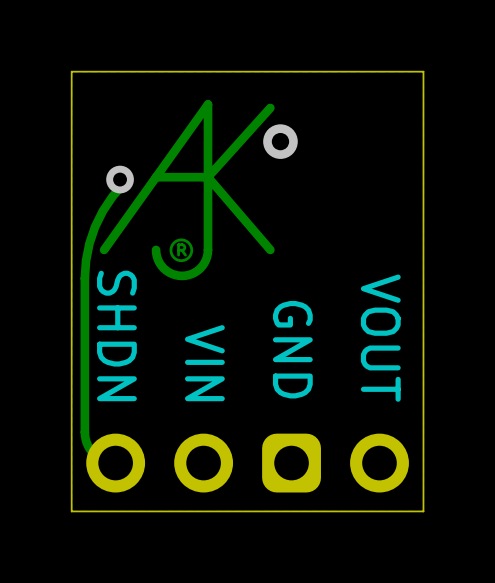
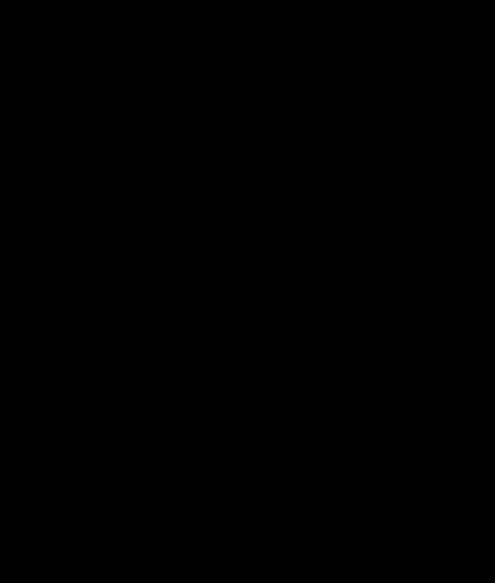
board edge: (423, 71) (71, 71) (71, 511) (423, 511) (423, 71) -> none
drawing: [99, 100, 275, 281] -> none
via: (280, 141) -> none
via: (120, 179) -> none
track: (124, 183) (102, 210) (95, 226) (89, 243) (84, 278) (85, 435) (87, 445) (96, 456) (105, 461) (115, 463) -> none
text: SHDN (116, 335) -> none
text: VOUT (380, 338) -> none
text: GND (292, 349) -> none
text: VIN (204, 363) -> none
part: (247, 463) -> none

